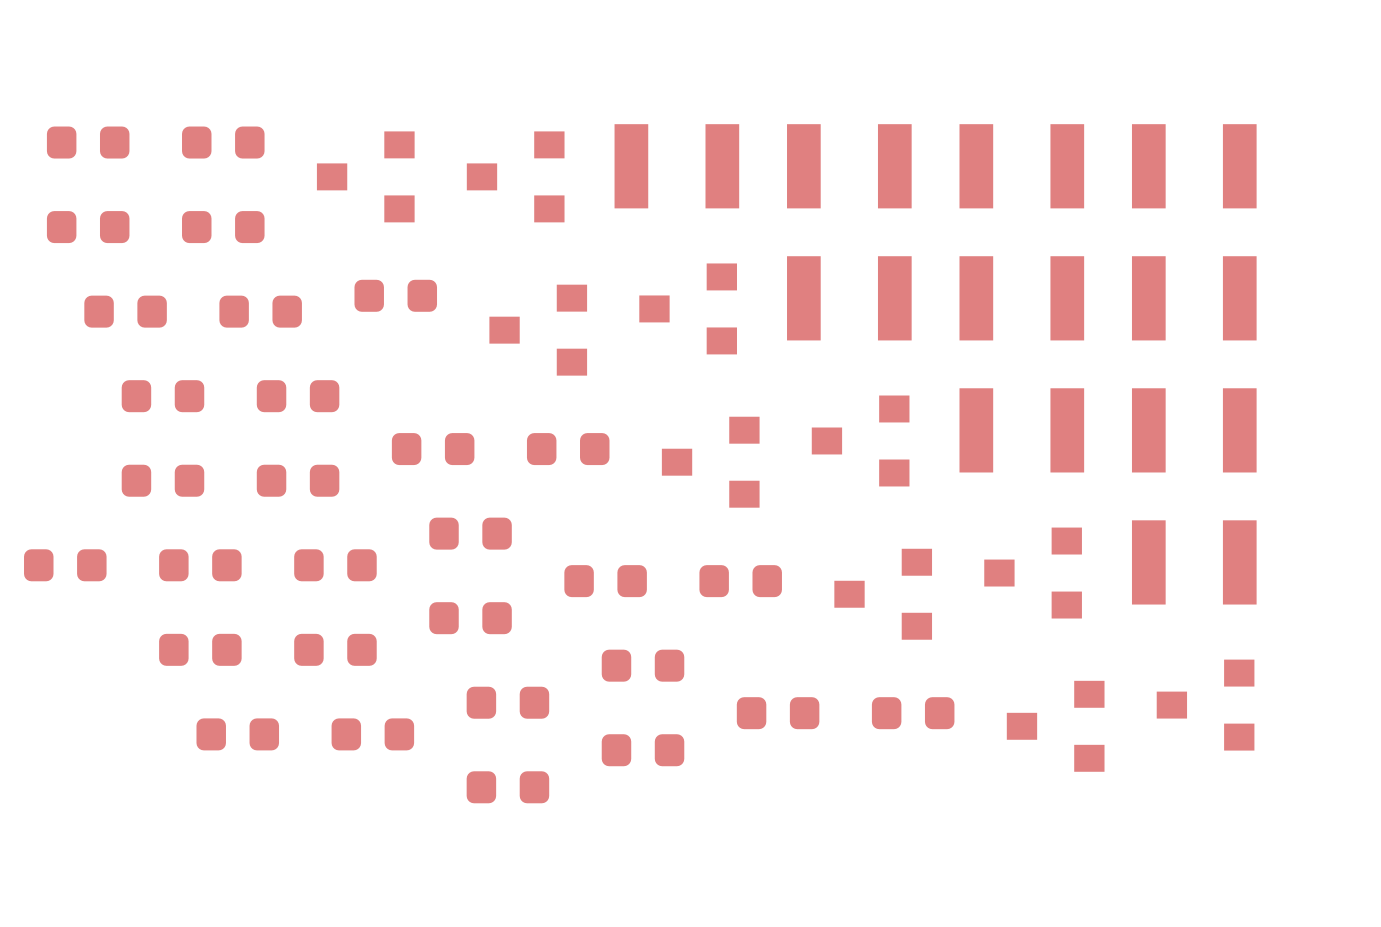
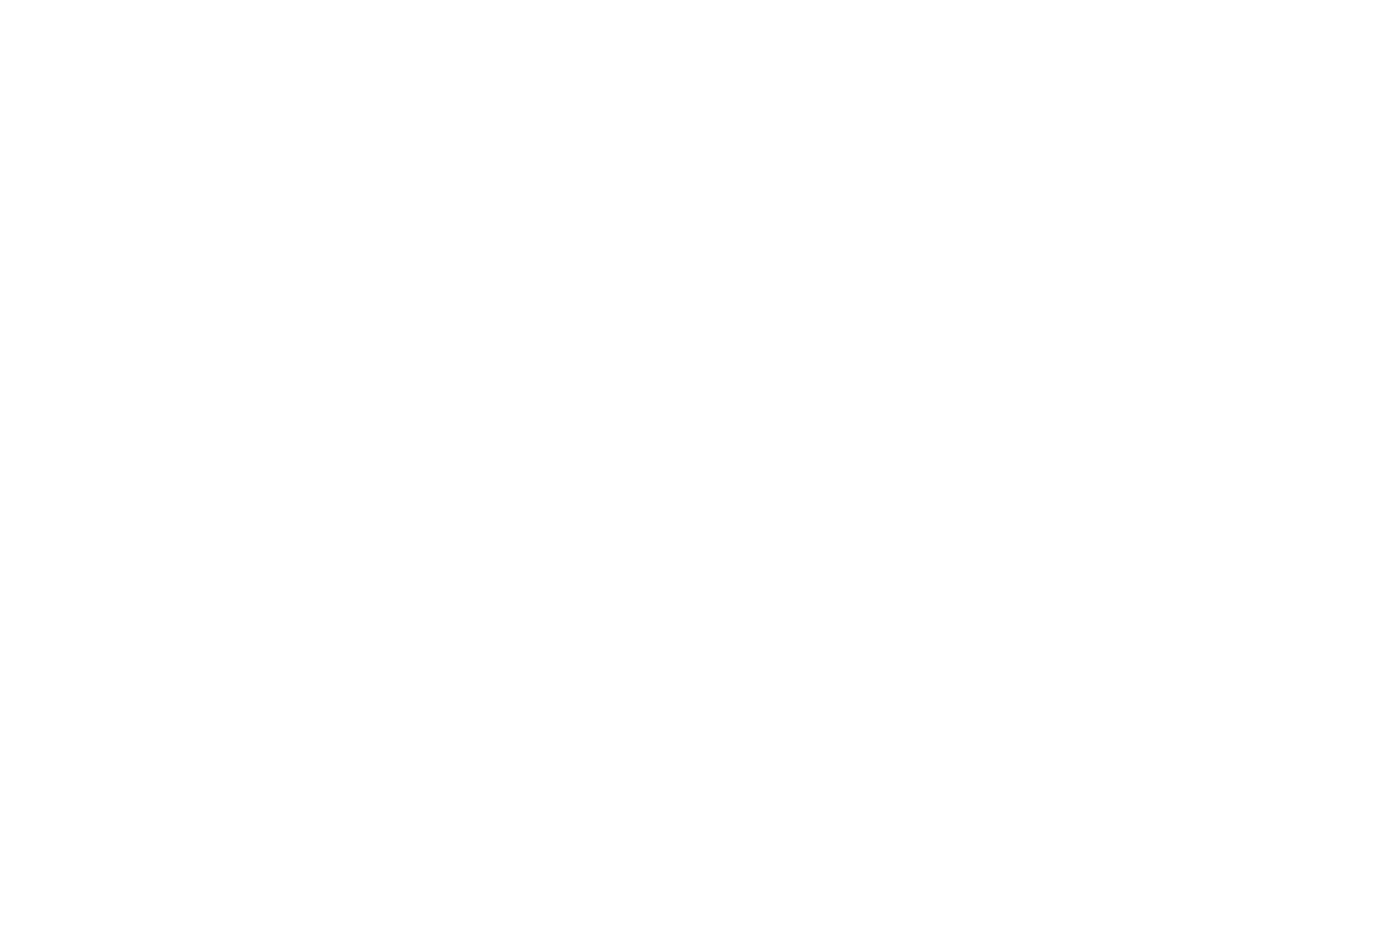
part: (88, 142) -> none
part: (223, 142) -> none
part: (676, 166) -> none
part: (849, 166) -> none
part: (1021, 166) -> none
part: (1194, 166) -> none
part: (365, 176) -> none
part: (515, 176) -> none
part: (88, 227) -> none
part: (223, 227) -> none
part: (395, 295) -> none
part: (849, 298) -> none
part: (1021, 298) -> none
part: (1194, 298) -> none
part: (688, 308) -> none
part: (125, 311) -> none
part: (260, 311) -> none
part: (538, 330) -> none
part: (162, 396) -> none
part: (298, 396) -> none
part: (1021, 430) -> none
part: (1194, 430) -> none
part: (860, 440) -> none
part: (433, 449) -> none
part: (568, 449) -> none
part: (710, 462) -> none
part: (162, 480) -> none
part: (298, 480) -> none
part: (470, 533) -> none
part: (1194, 562) -> none
part: (65, 565) -> none
part: (200, 565) -> none
part: (335, 565) -> none
part: (1033, 573) -> none
part: (605, 581) -> none
part: (740, 581) -> none
part: (883, 594) -> none
part: (470, 618) -> none
part: (200, 649) -> none
part: (335, 649) -> none
part: (643, 665) -> none
part: (507, 702) -> none
part: (1205, 705) -> none
part: (778, 713) -> none
part: (913, 713) -> none
part: (1055, 726) -> none
part: (237, 734) -> none
part: (372, 734) -> none
part: (643, 750) -> none
part: (507, 787) -> none

